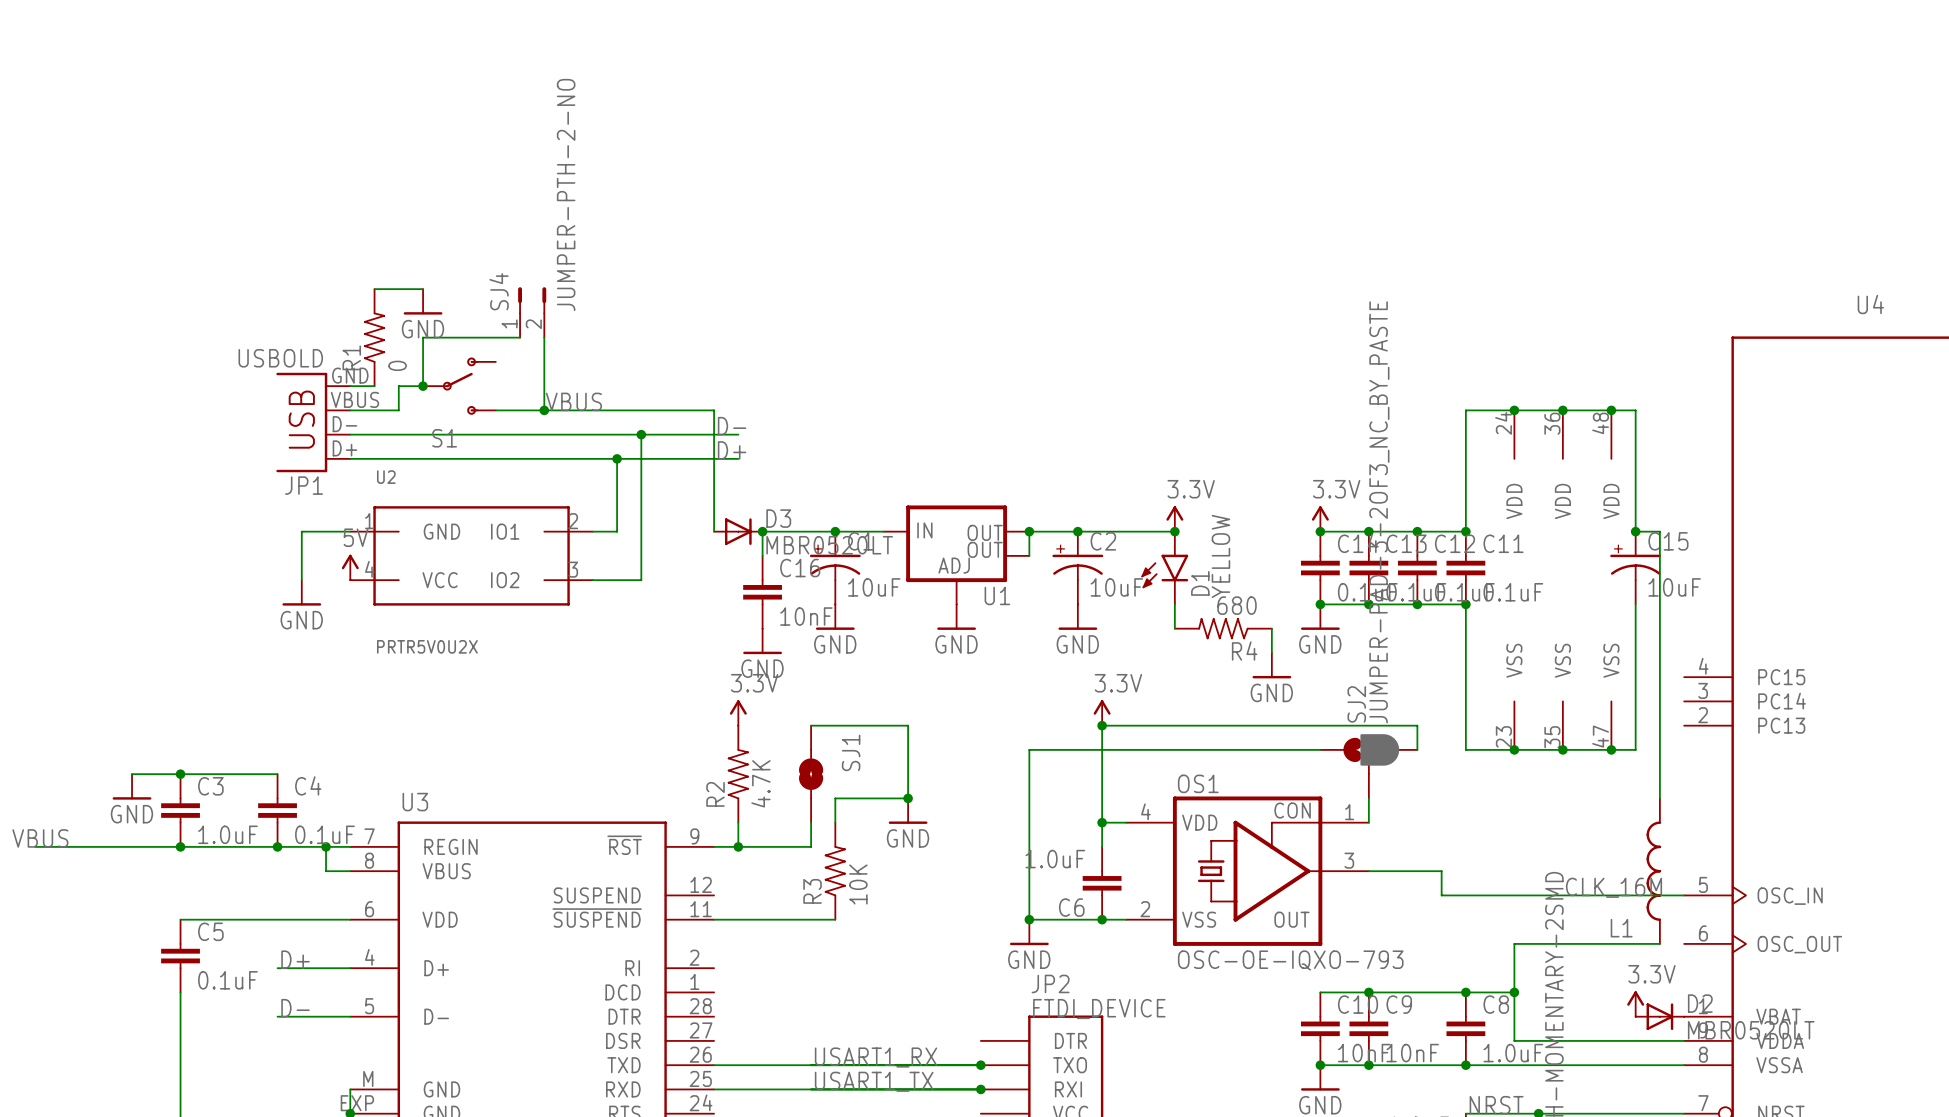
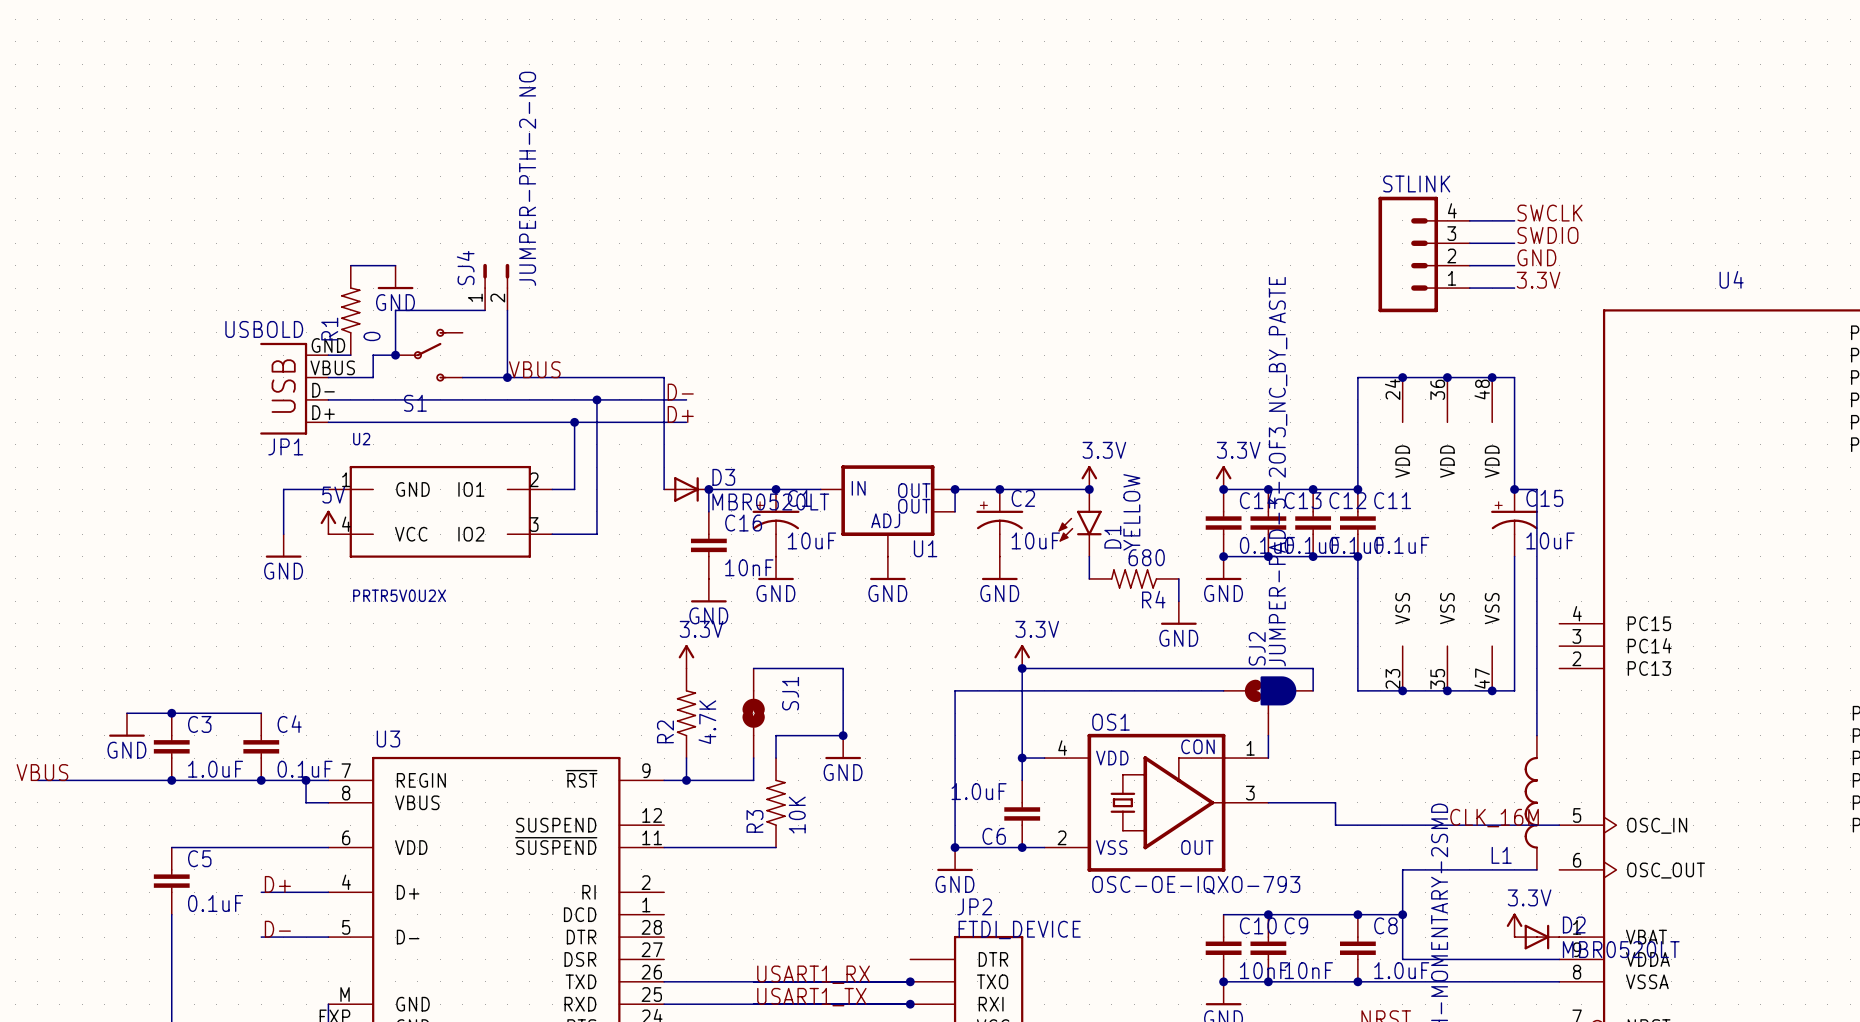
label: none -> SWCLK (1549, 213)
wire: none -> (1469, 220) (1514, 220)
label: none -> SWDIO (1547, 235)
wire: none -> (1469, 243) (1514, 243)
STLINK: none -> (1424, 254)
label: none -> GND (1536, 257)
wire: none -> (1469, 265) (1514, 265)
label: none -> 3.3V (1538, 280)
wire: none -> (1469, 288) (1514, 288)

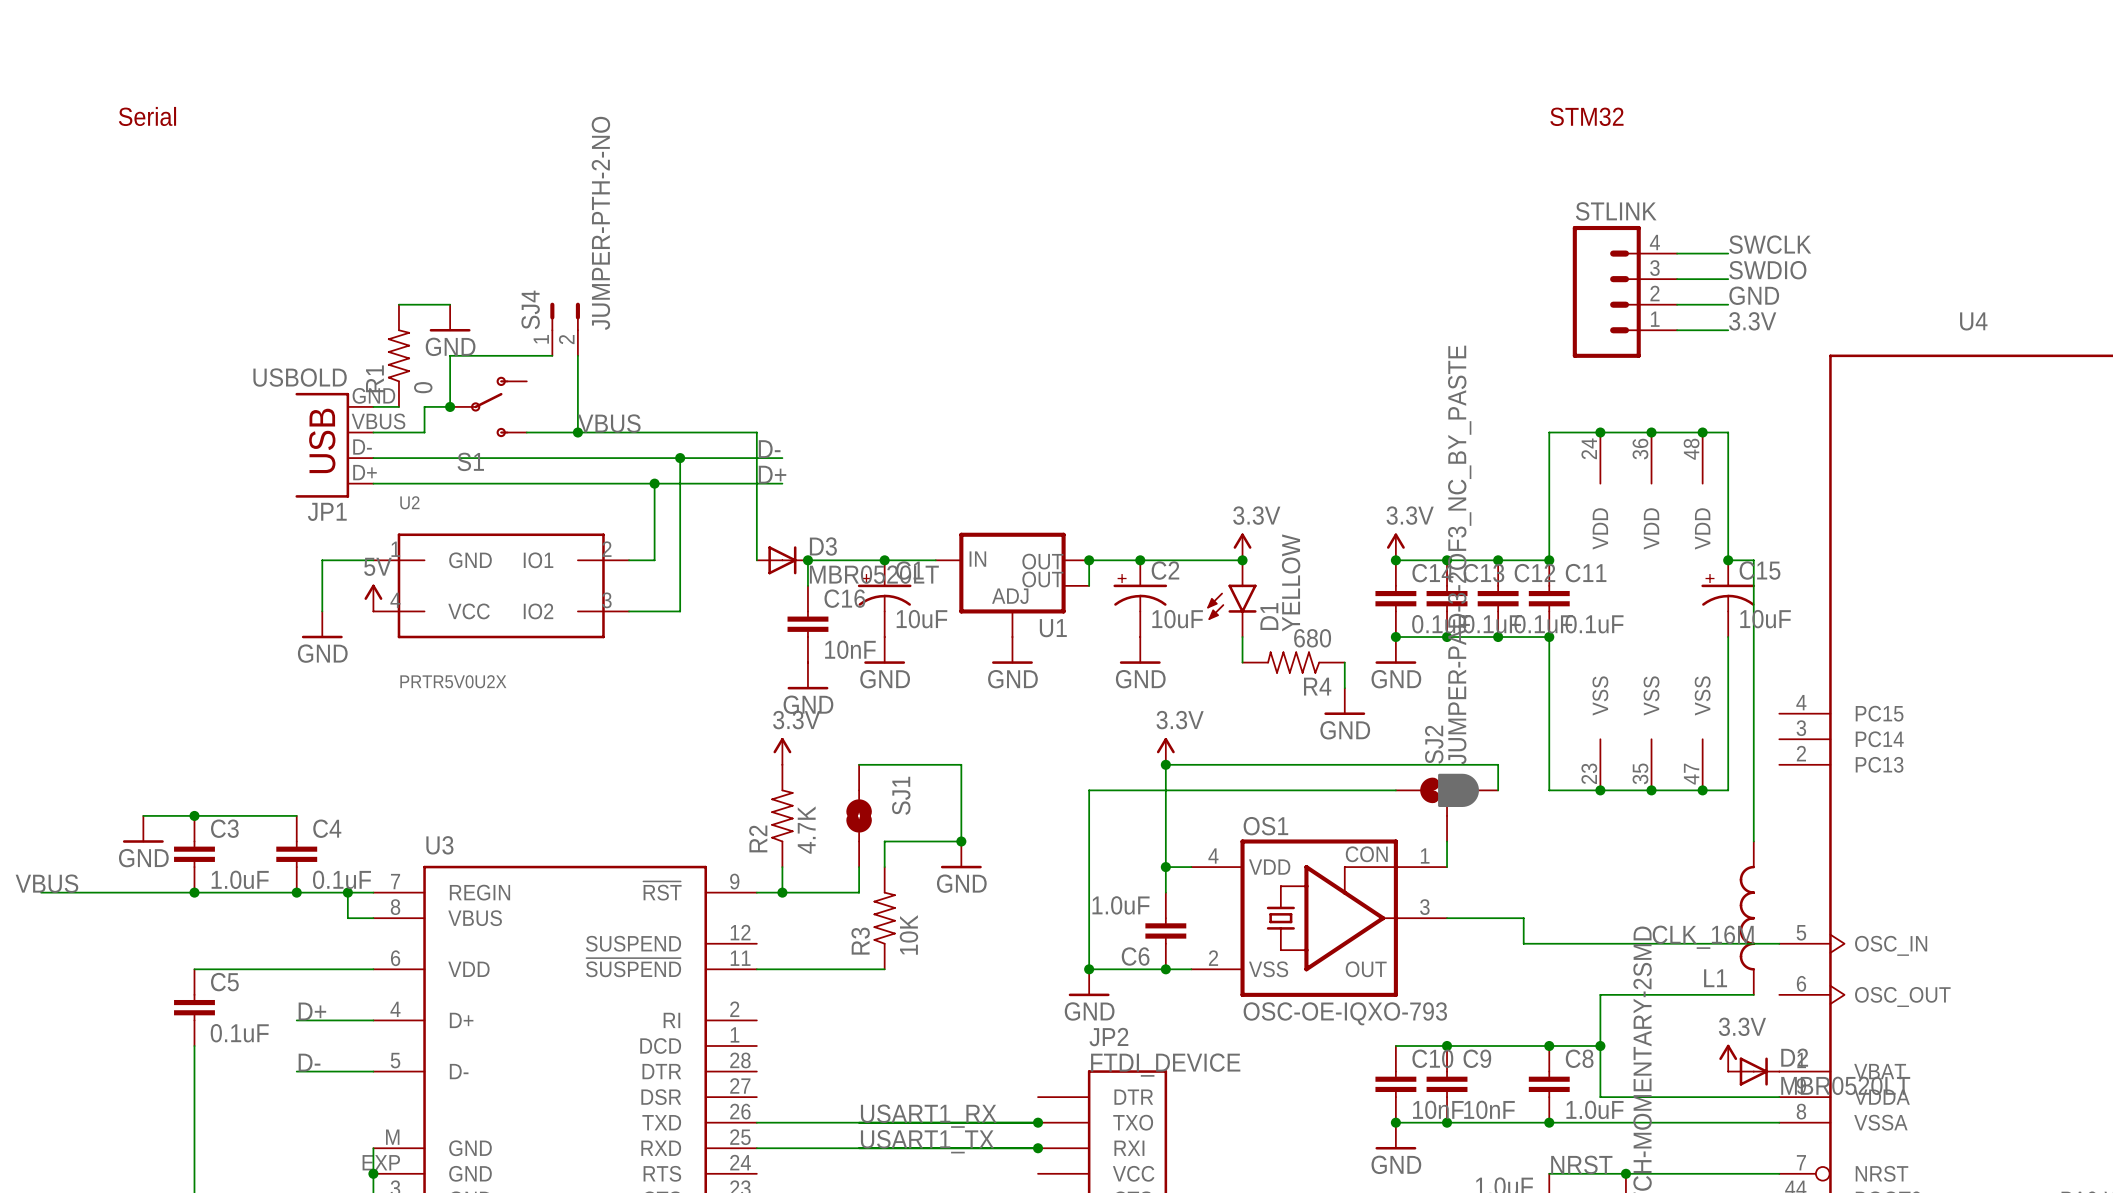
text: none -> Serial (147, 116)
text: none -> STM32 (1586, 116)

